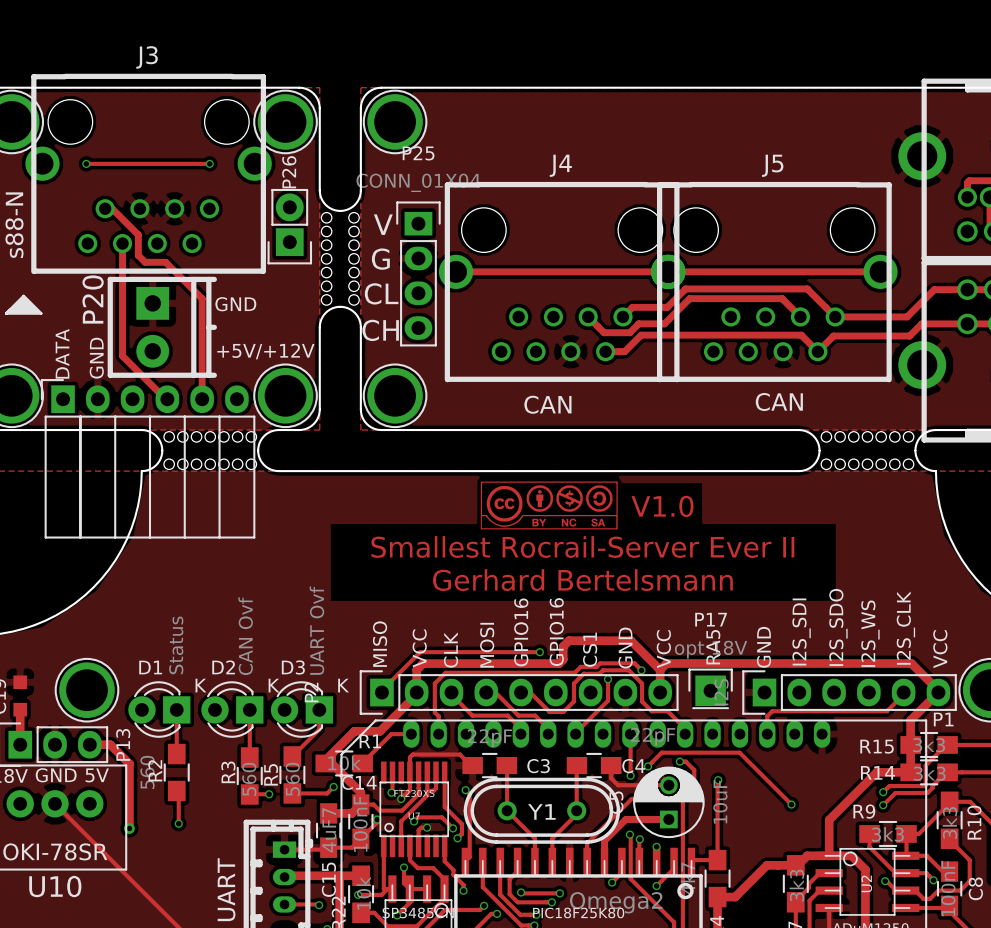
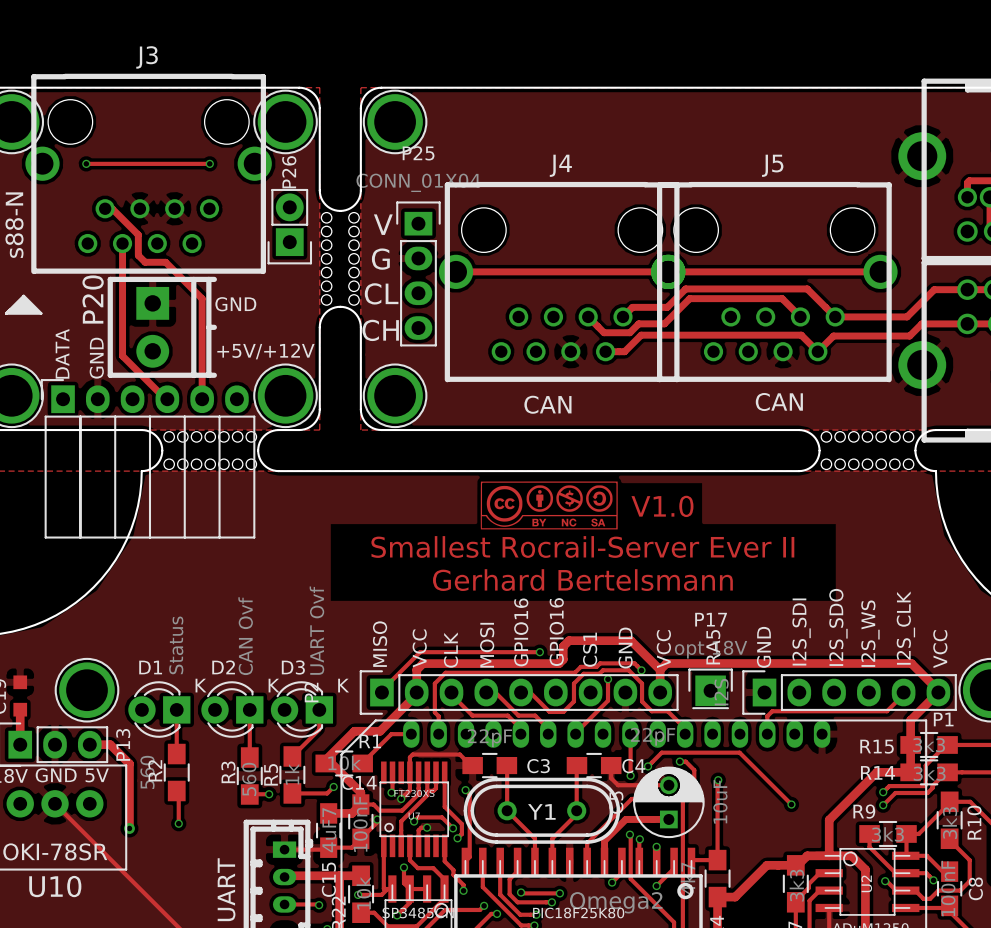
R5 value: 560 (292, 779) -> 1k (292, 774)

